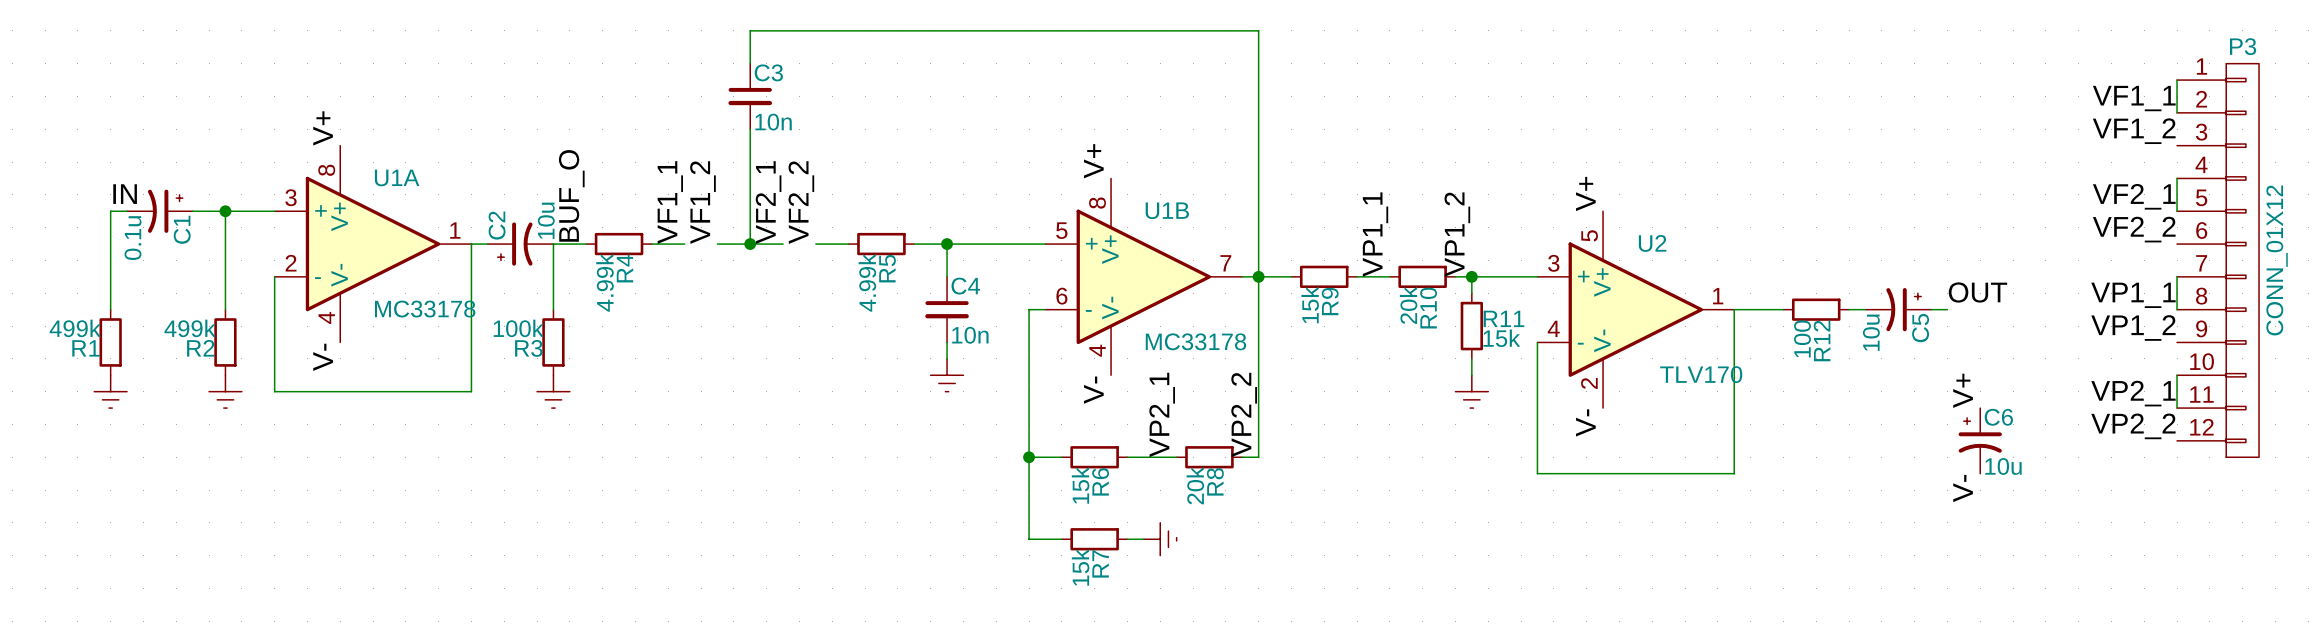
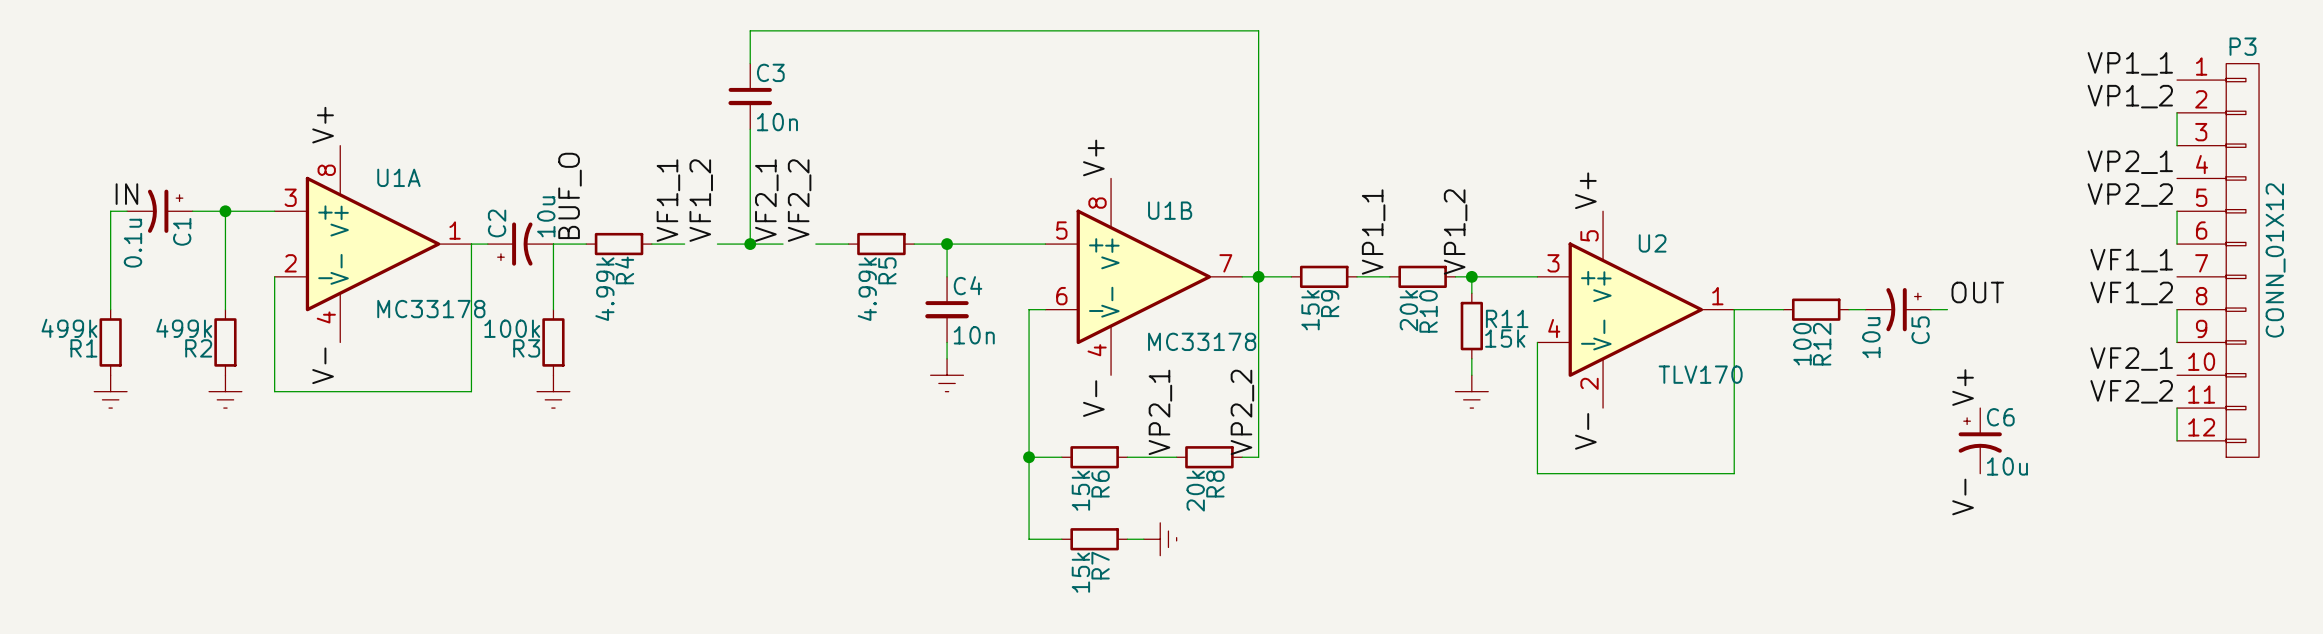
label: none -> VP1_1 (2130, 63)
wire: (2177, 80) (2177, 112) -> (2177, 145) (2177, 112)
label: VF1_1 (2134, 98) -> VP1_2 (2130, 96)
label: VF1_2 (2134, 131) -> none
label: none -> VP2_1 (2130, 162)
wire: (2177, 178) (2177, 211) -> (2177, 244) (2177, 211)
label: VF2_1 (2134, 196) -> VP2_2 (2130, 195)
label: VF2_2 (2134, 229) -> none
label: none -> VF1_1 (2131, 260)
wire: (2177, 276) (2177, 309) -> (2177, 342) (2177, 309)
label: VP1_1 (2133, 295) -> VF1_2 (2131, 293)
label: VP1_2 (2133, 327) -> none
label: none -> VF2_1 (2131, 359)
wire: (2177, 375) (2177, 408) -> (2177, 440) (2177, 408)
label: VP2_1 (2133, 393) -> VF2_2 (2131, 391)
label: VP2_2 (2133, 426) -> none

